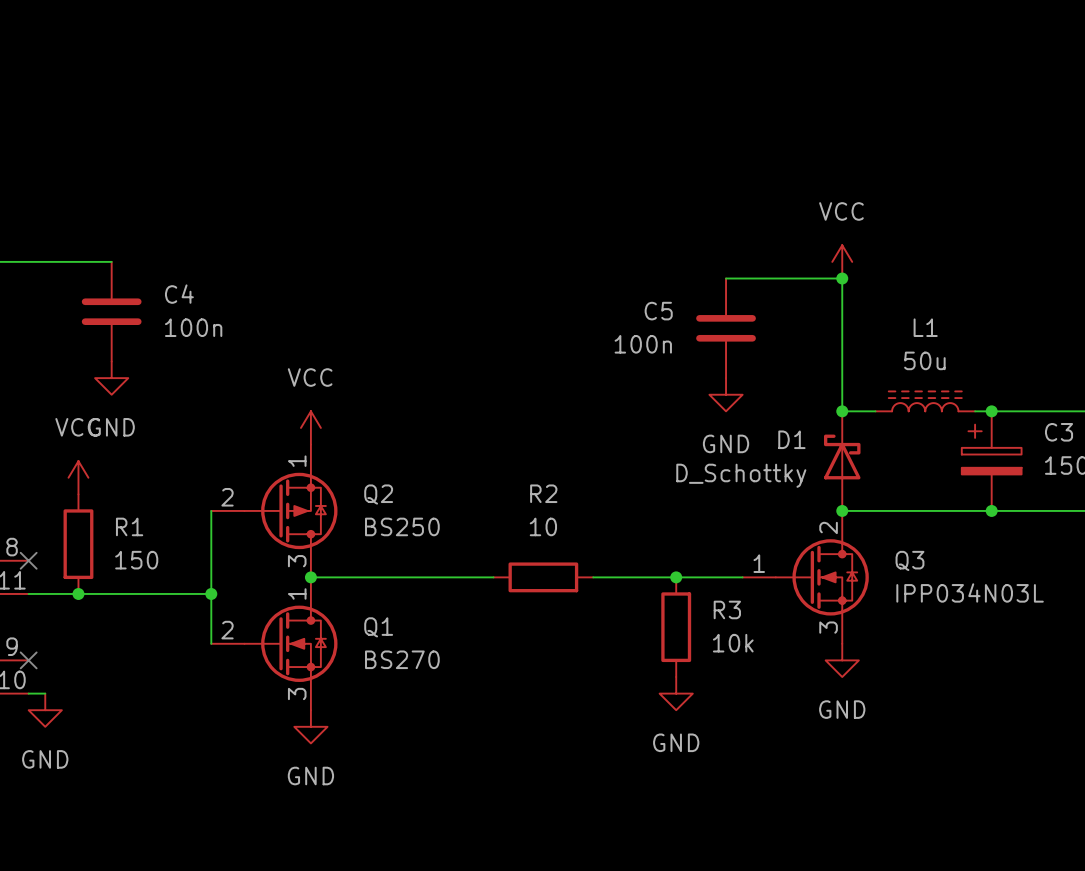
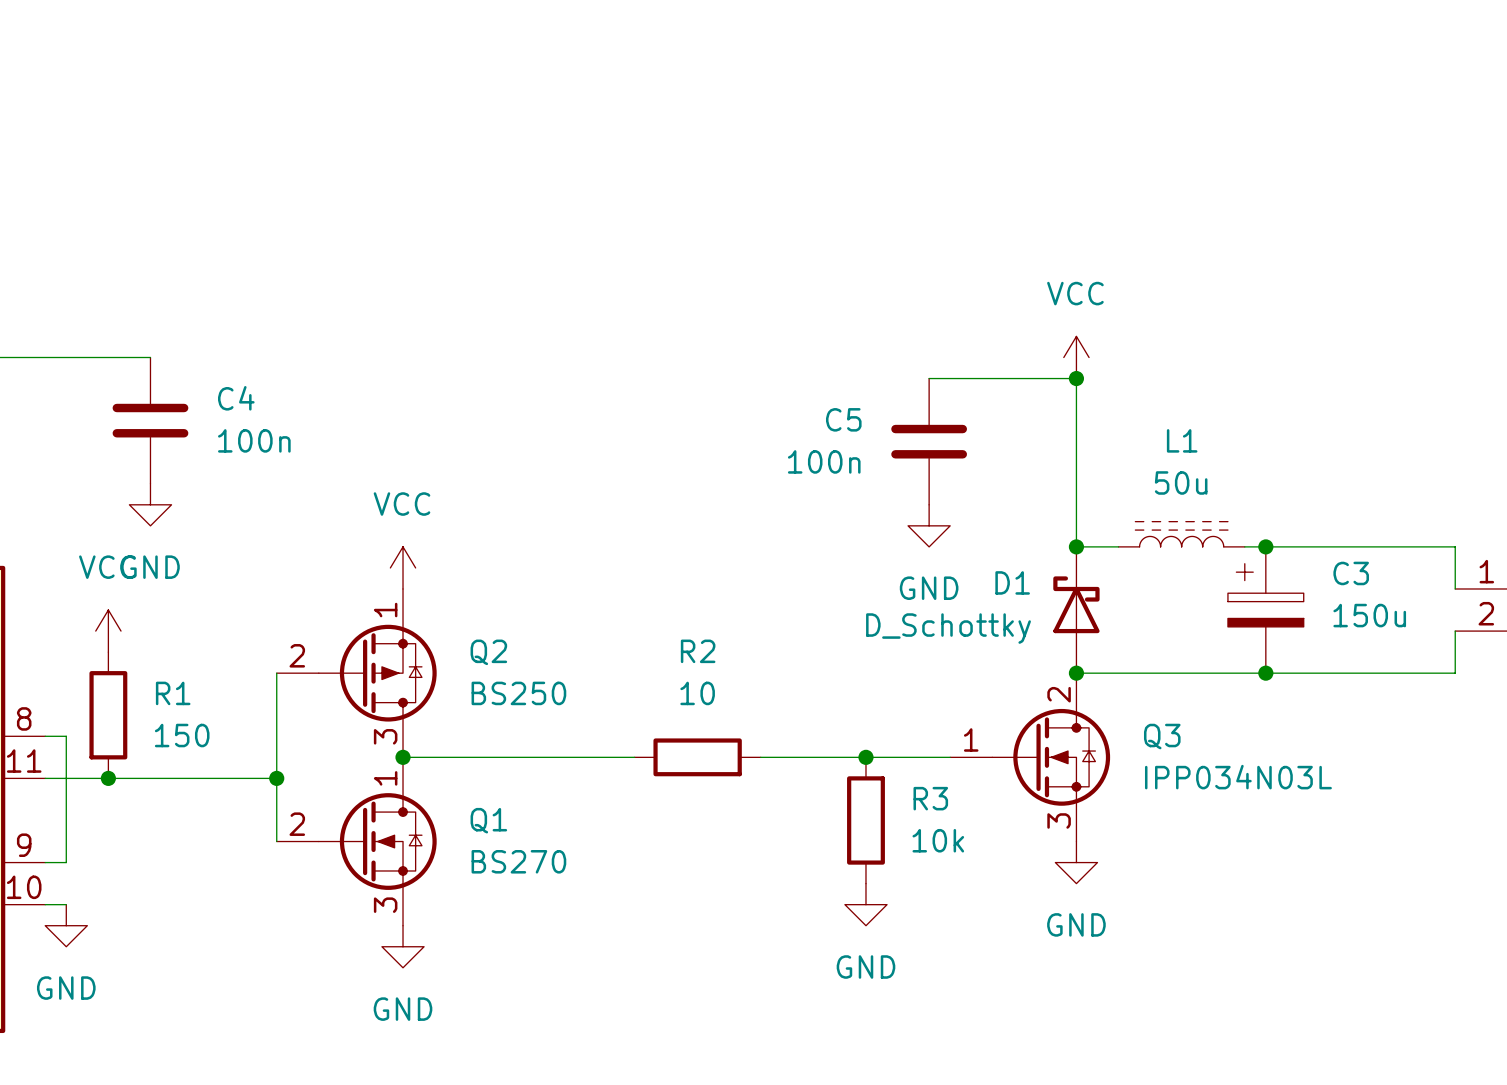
wire: none -> (45, 736) (66, 736) (66, 862) (45, 862)
no-connect mark: (28, 560) -> none
no-connect mark: (28, 660) -> none

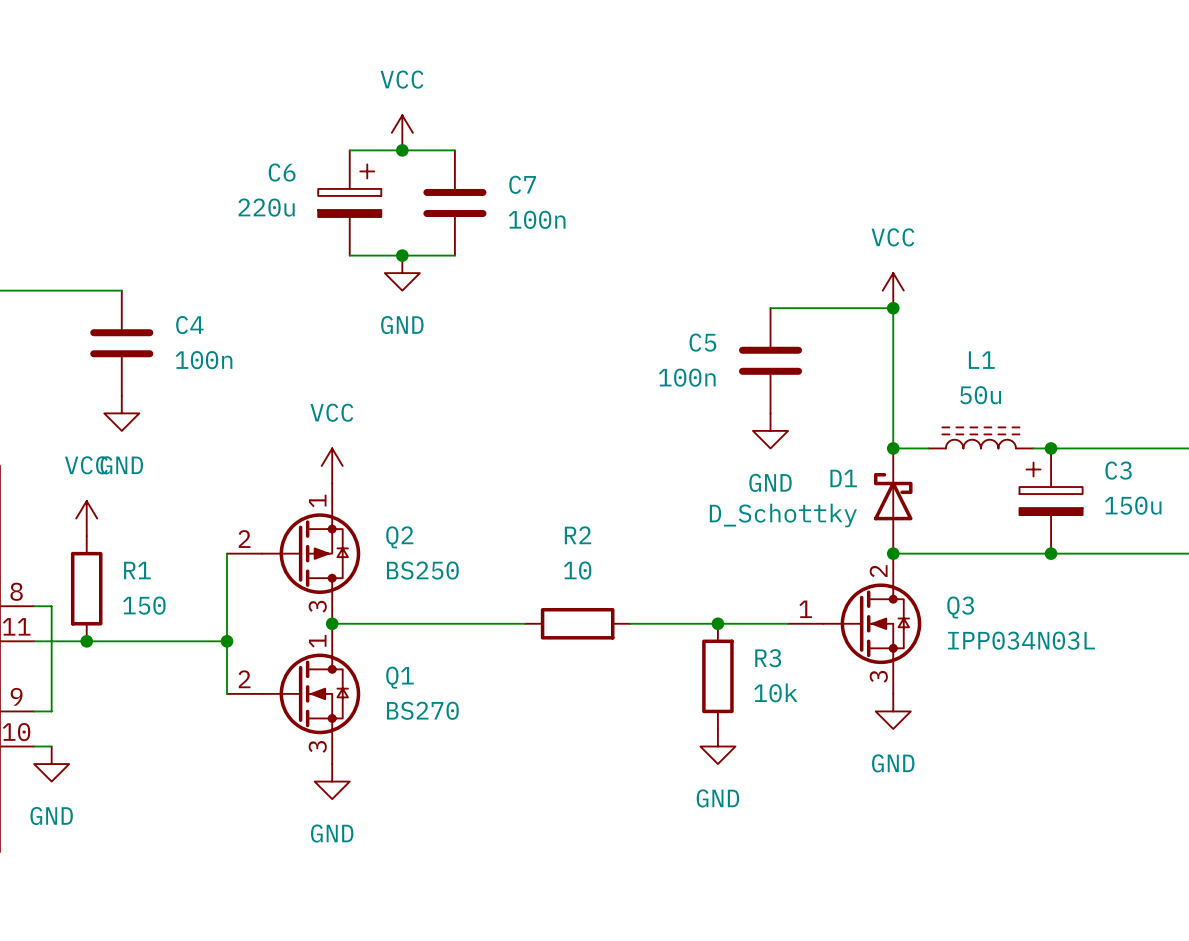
power symbol: none -> VCC (402, 132)
wire: none -> (349, 150) (454, 150)
junction: none -> (402, 150)
C6: none -> 220u (349, 202)
C7: none -> 100n (454, 202)
wire: none -> (349, 255) (454, 255)
junction: none -> (402, 255)
power symbol: none -> GND (402, 273)

